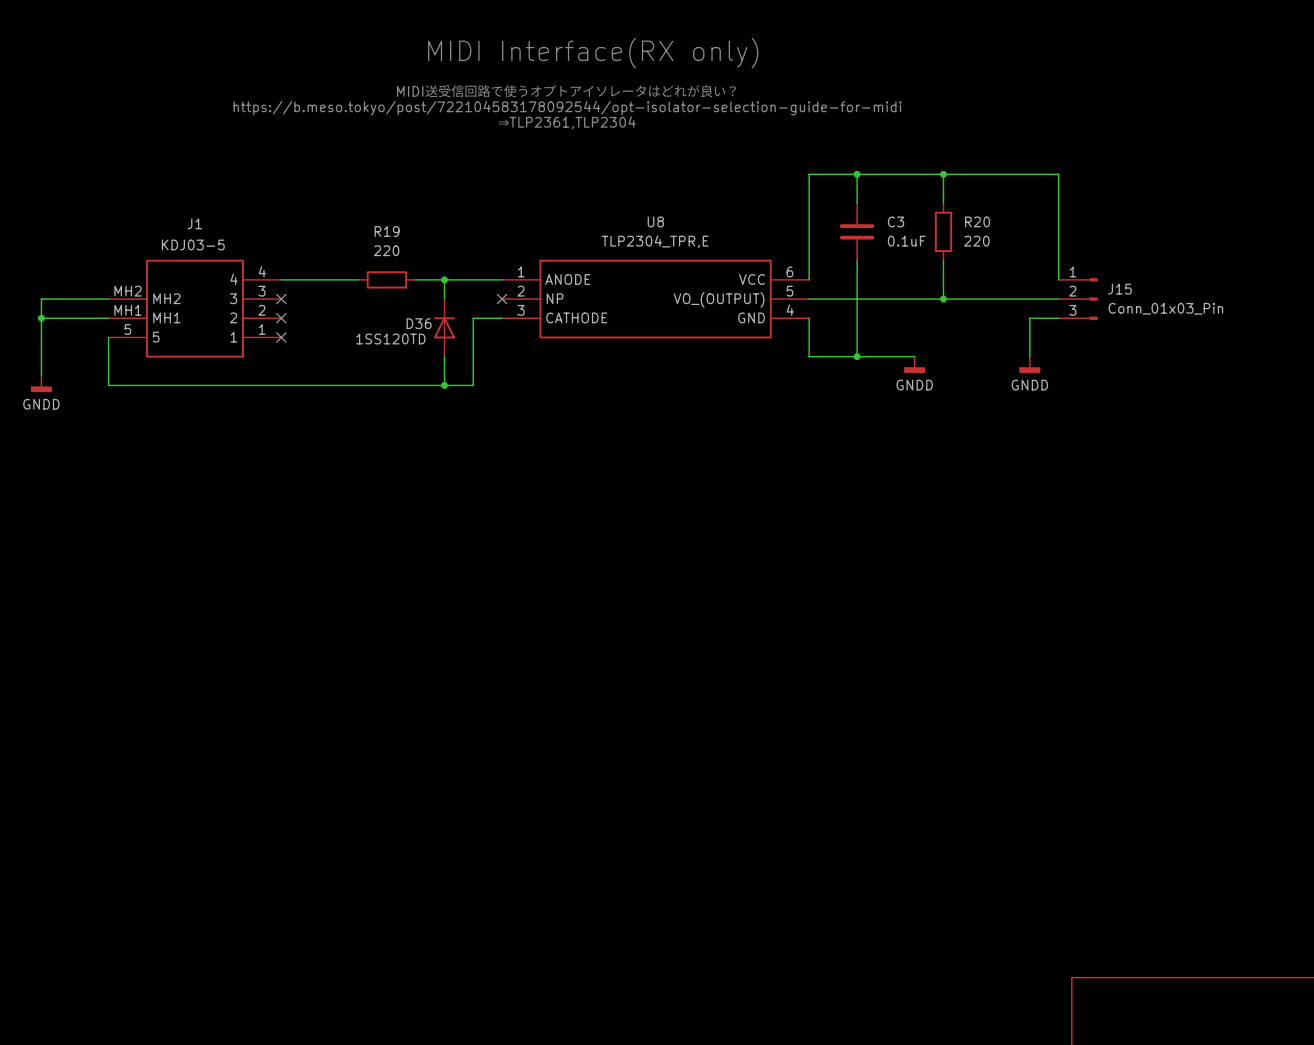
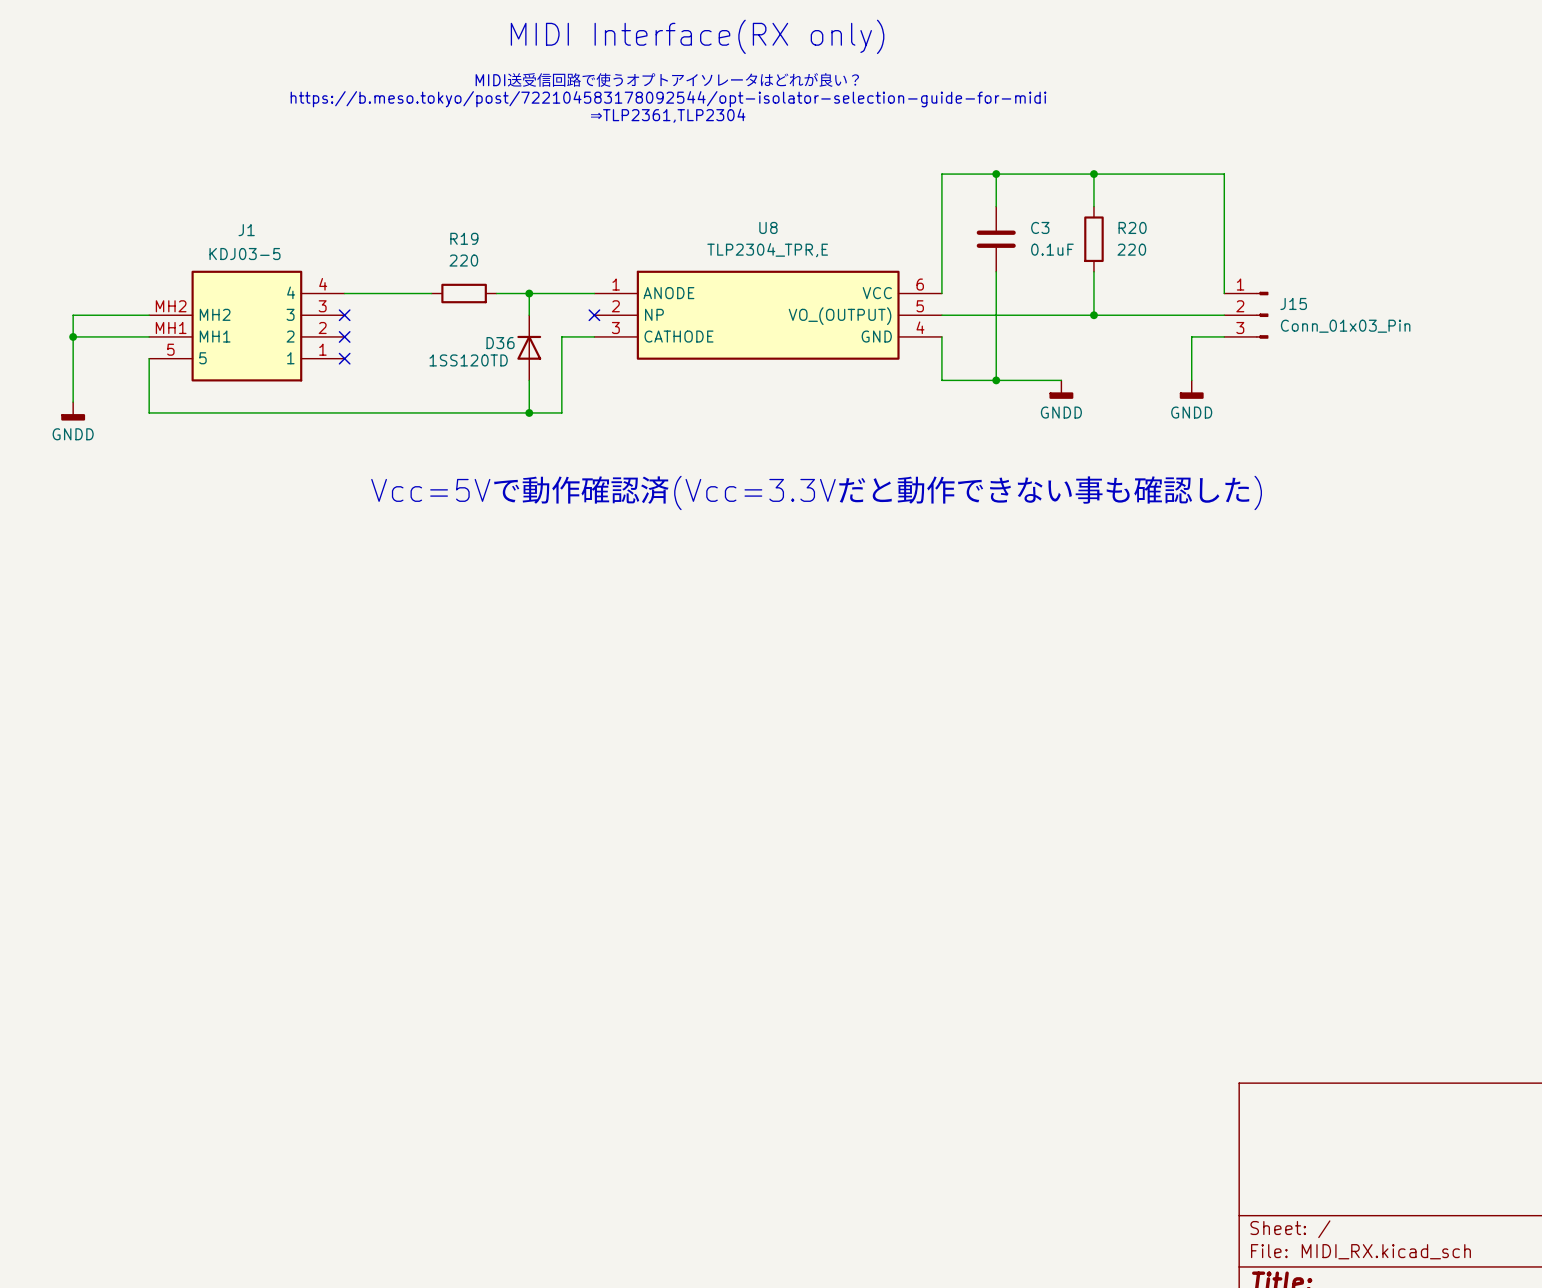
text: none -> Vcc=5Vで動作確認済(Vcc=3.3Vだと動作できない事も確認した) (816, 492)

